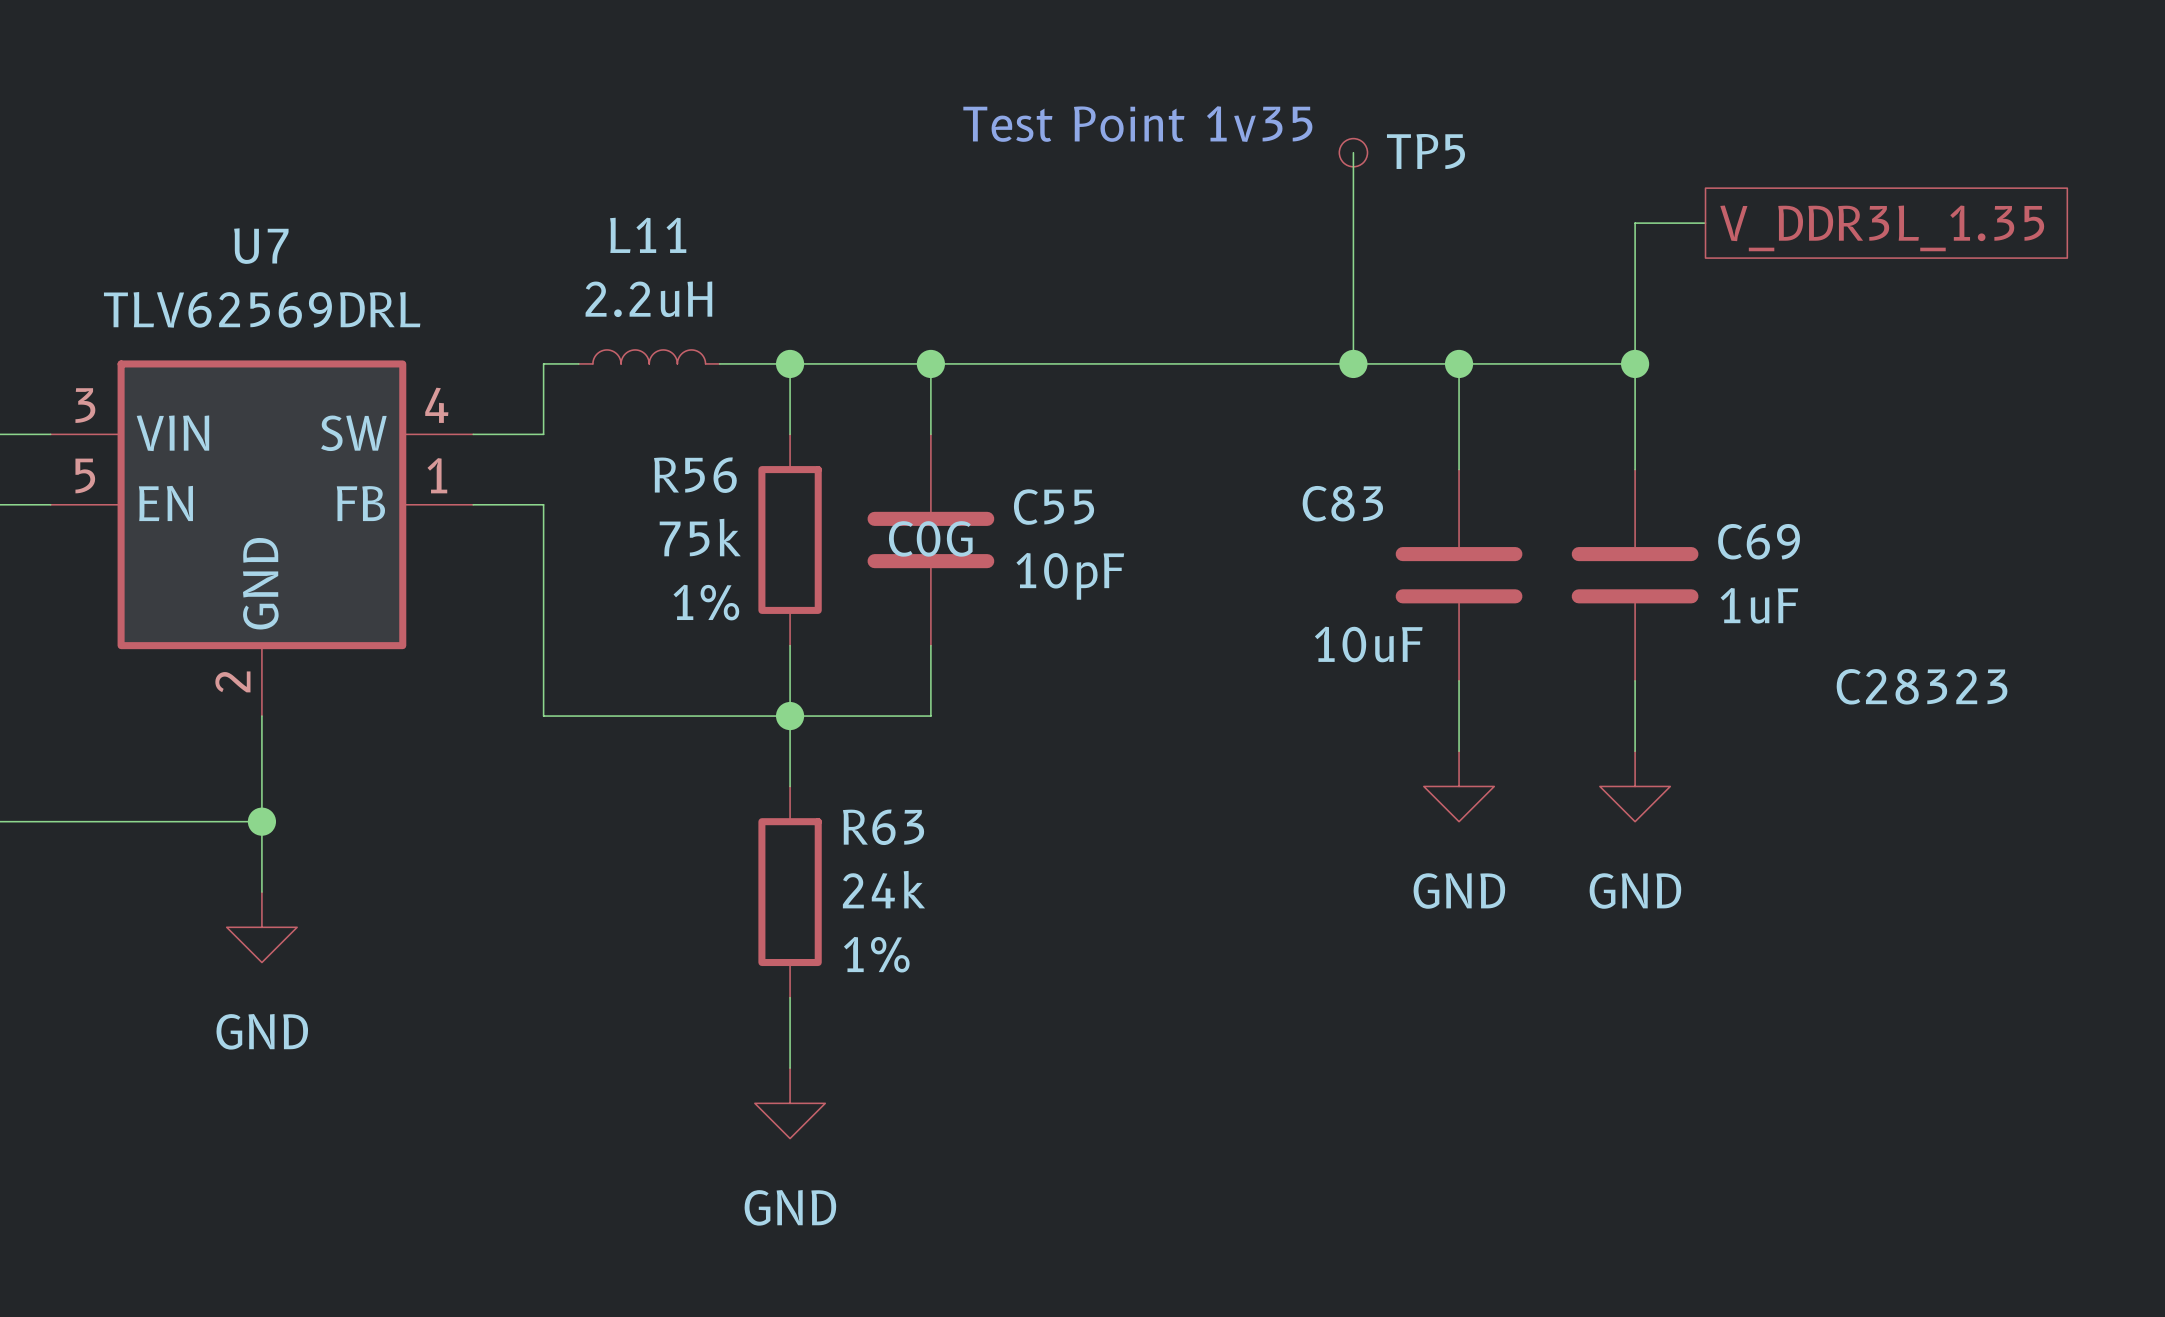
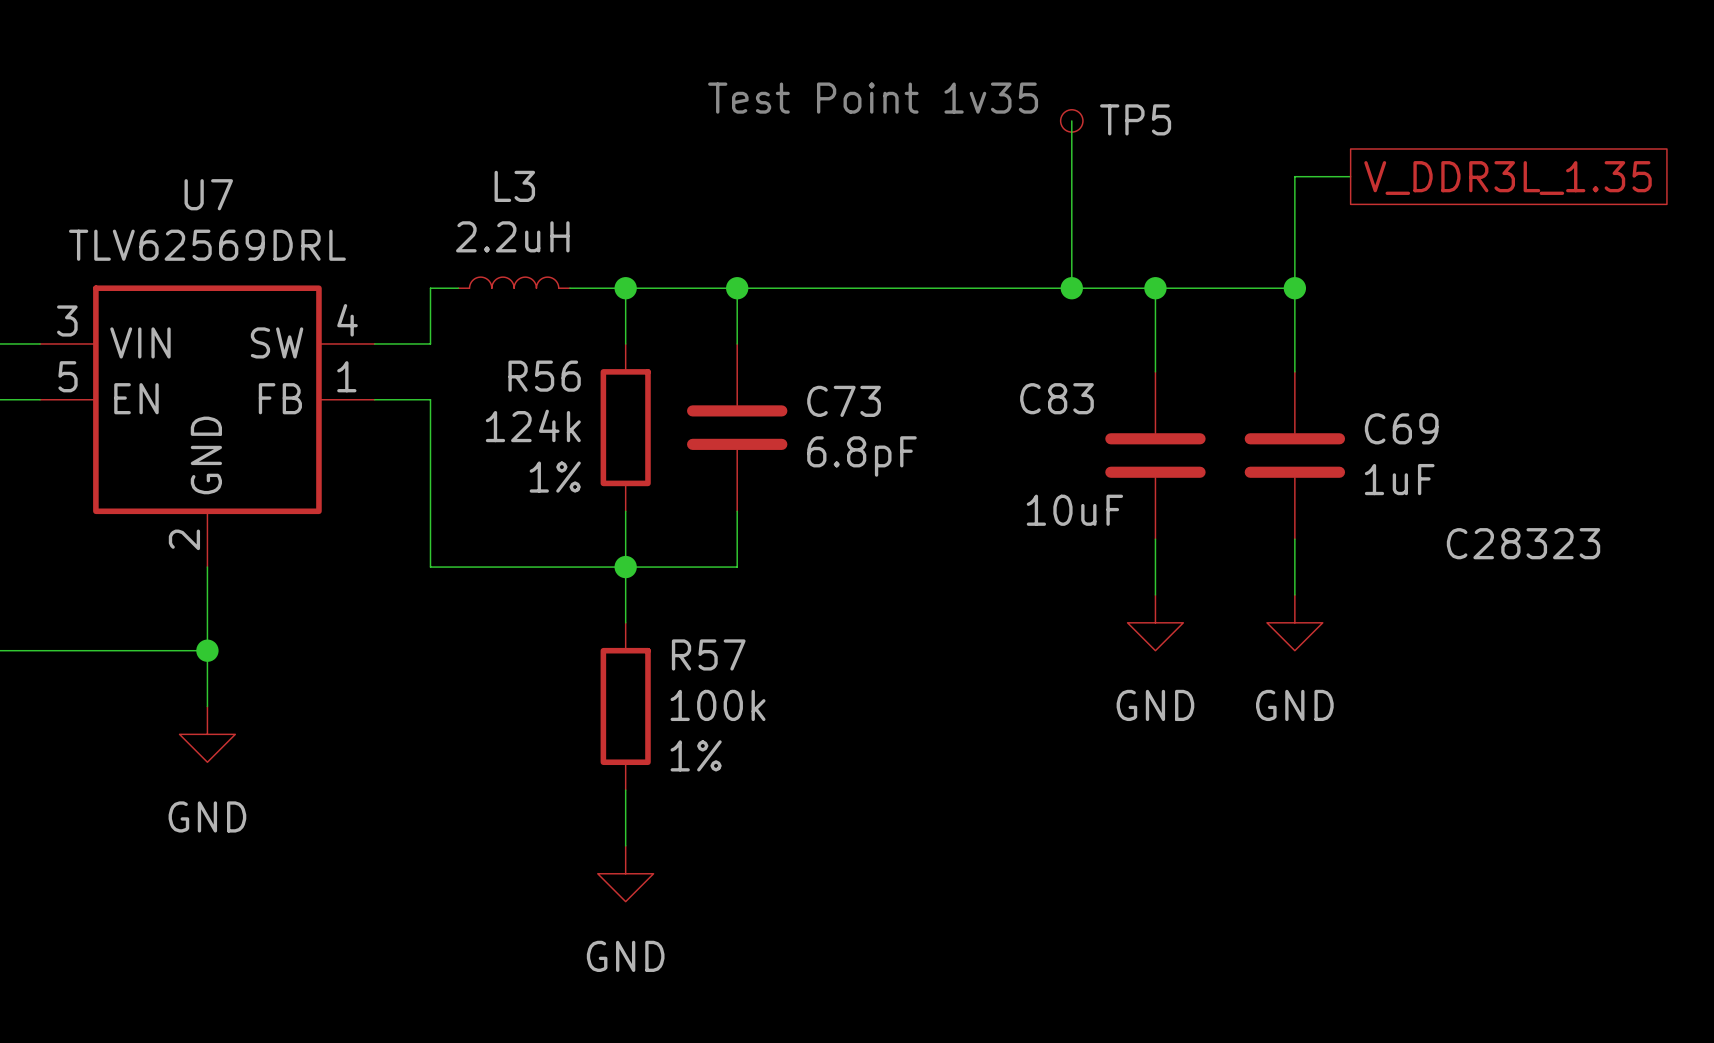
L11 name: L11 (648, 235) -> L3 (514, 186)
C55 name: C55 (1054, 507) -> C73 (844, 401)
R56 value: 75k (700, 537) -> 124k (533, 425)
C55 text: C0G (930, 538) -> none
C55 value: 10pF (1070, 576) -> 6.8pF (861, 456)
R63 name: R63 (883, 827) -> R57 (708, 654)
R63 value: 24k (883, 889) -> 100k (718, 705)

